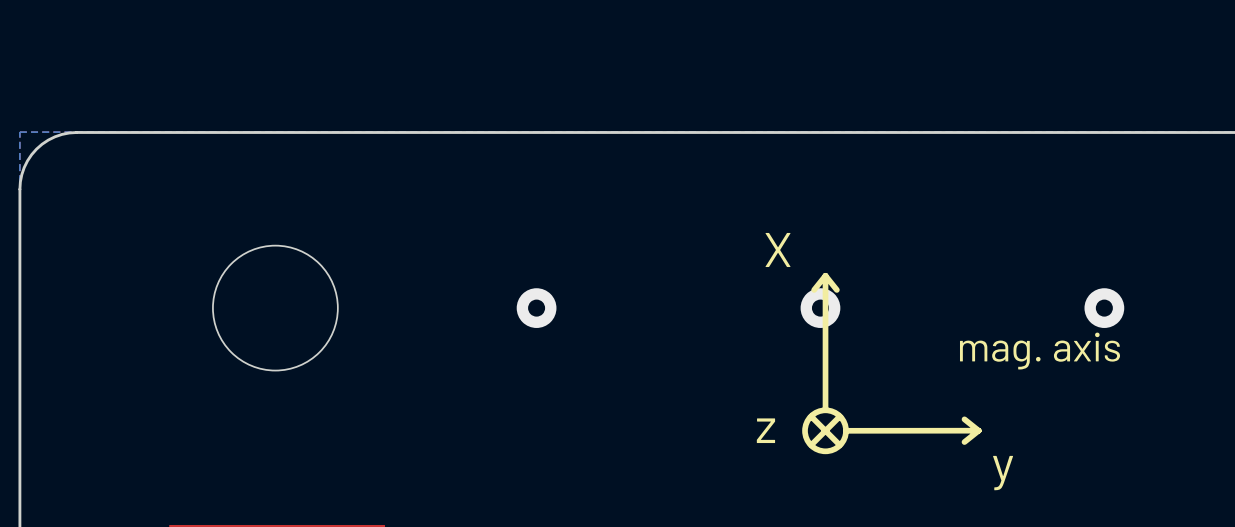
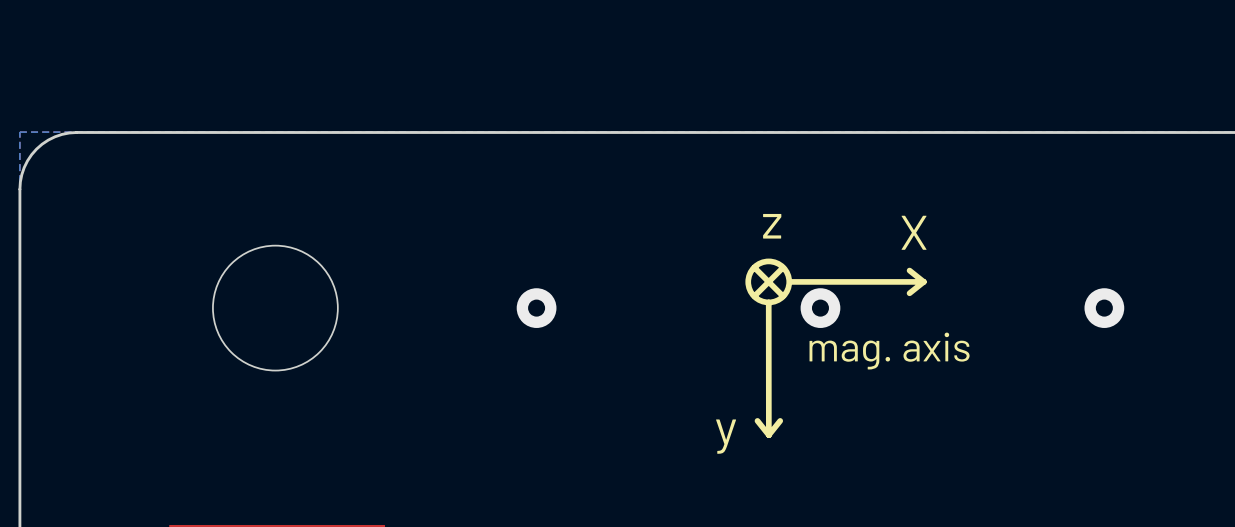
text rotation: 0° (778, 249) -> 180° (914, 232)
text position: X (778, 249) -> X (914, 232)
line: (825, 275) (825, 408) -> (768, 302) (768, 435)
line: (825, 275) (814, 289) -> (780, 420) (768, 435)
line: (825, 275) (836, 289) -> (757, 420) (768, 435)
text position: mag. axis (1040, 351) -> mag. axis (889, 351)
line: (811, 416) (839, 445) -> (754, 267) (782, 296)
line: (839, 416) (811, 445) -> (782, 267) (754, 296)
line: (964, 419) (978, 430) -> (909, 270) (923, 281)
text rotation: 0° (765, 430) -> 180° (772, 226)
text position: z (765, 430) -> z (772, 226)
drawing position: (825, 430) -> (768, 281)
line: (978, 430) (964, 442) -> (923, 281) (909, 293)
line: (978, 430) (846, 430) -> (923, 281) (790, 281)
text position: y (1003, 473) -> y (726, 436)

